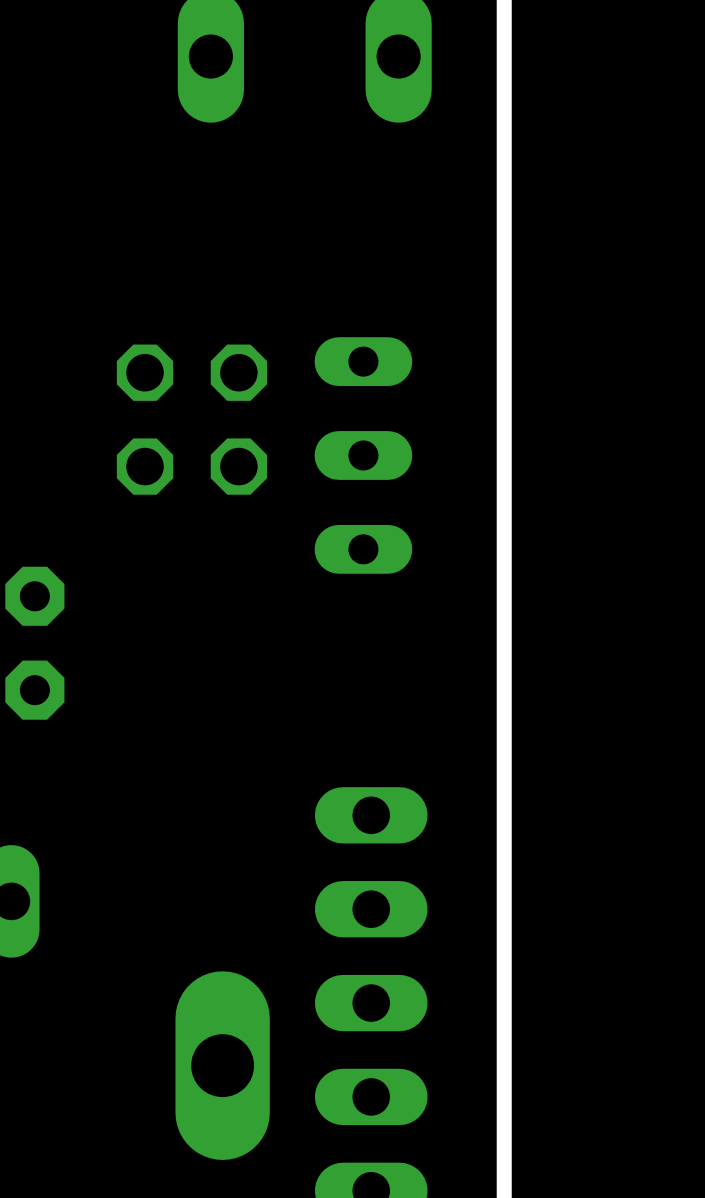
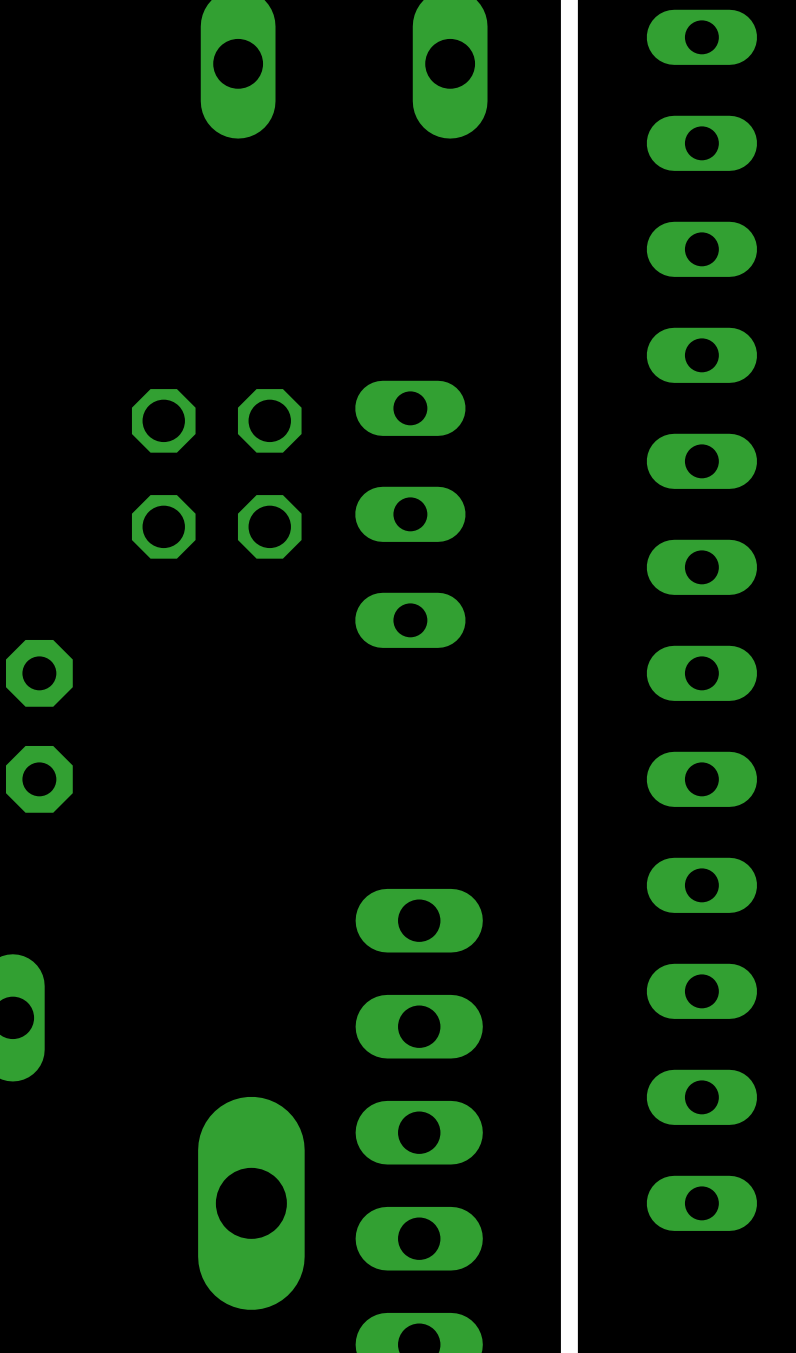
part: none -> (701, 620)

